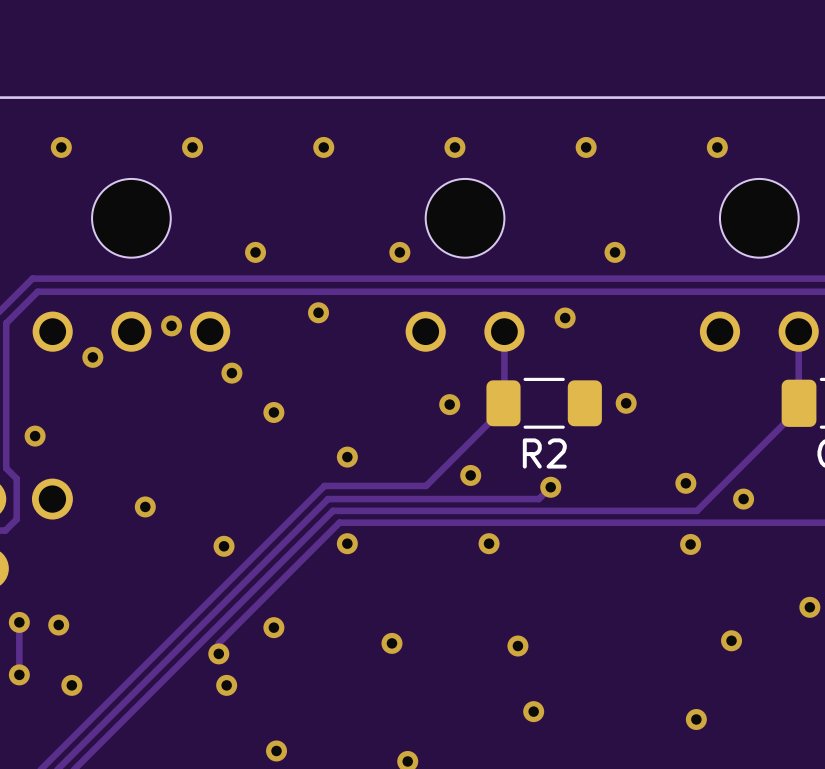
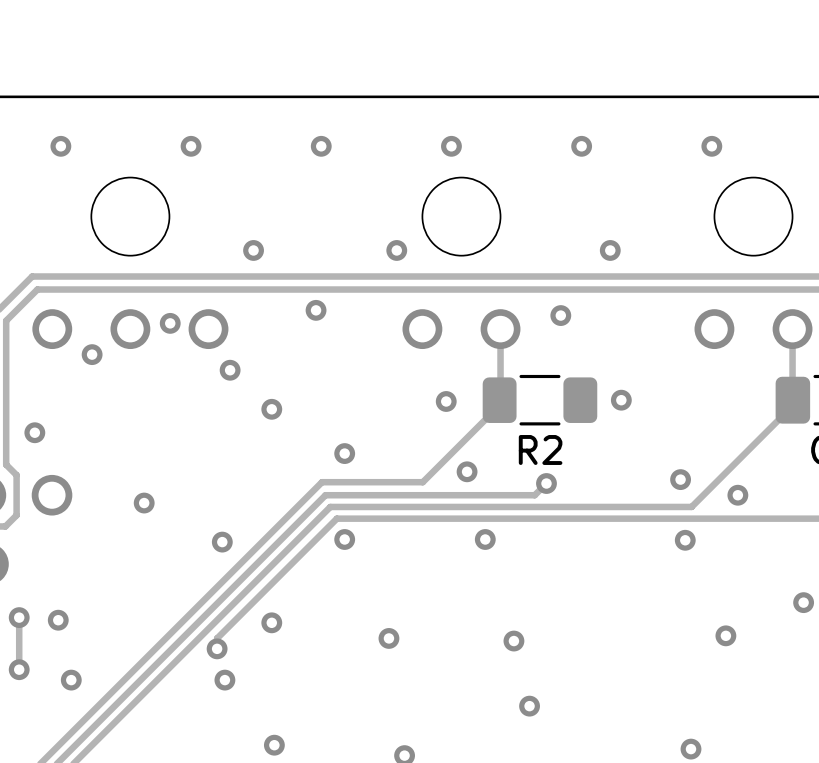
via position: (696, 719) -> (691, 749)

